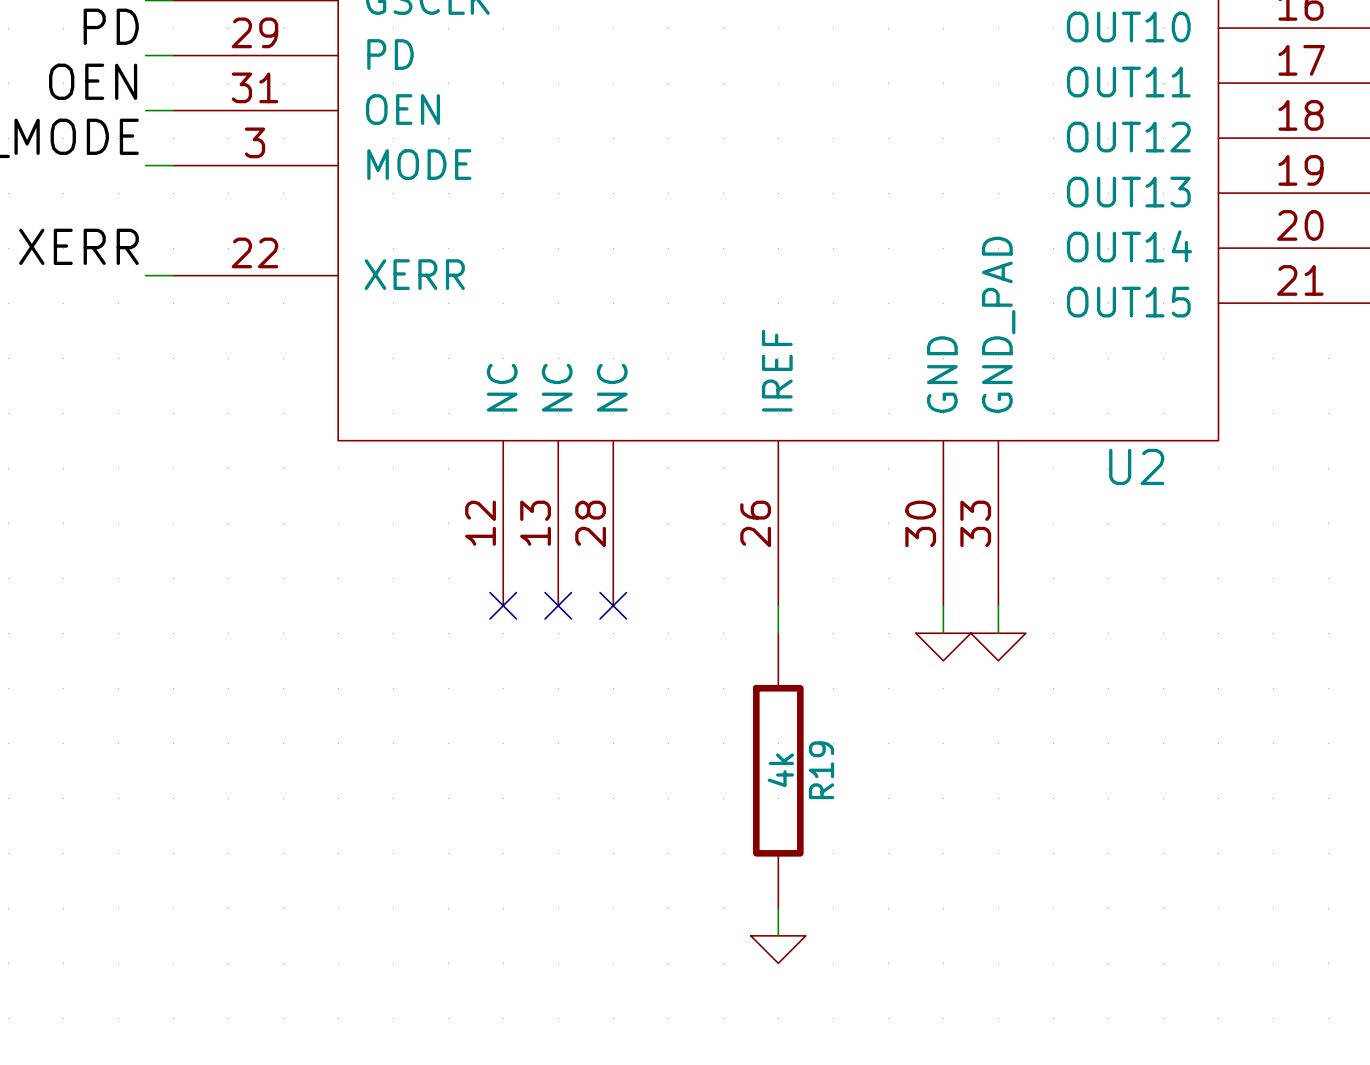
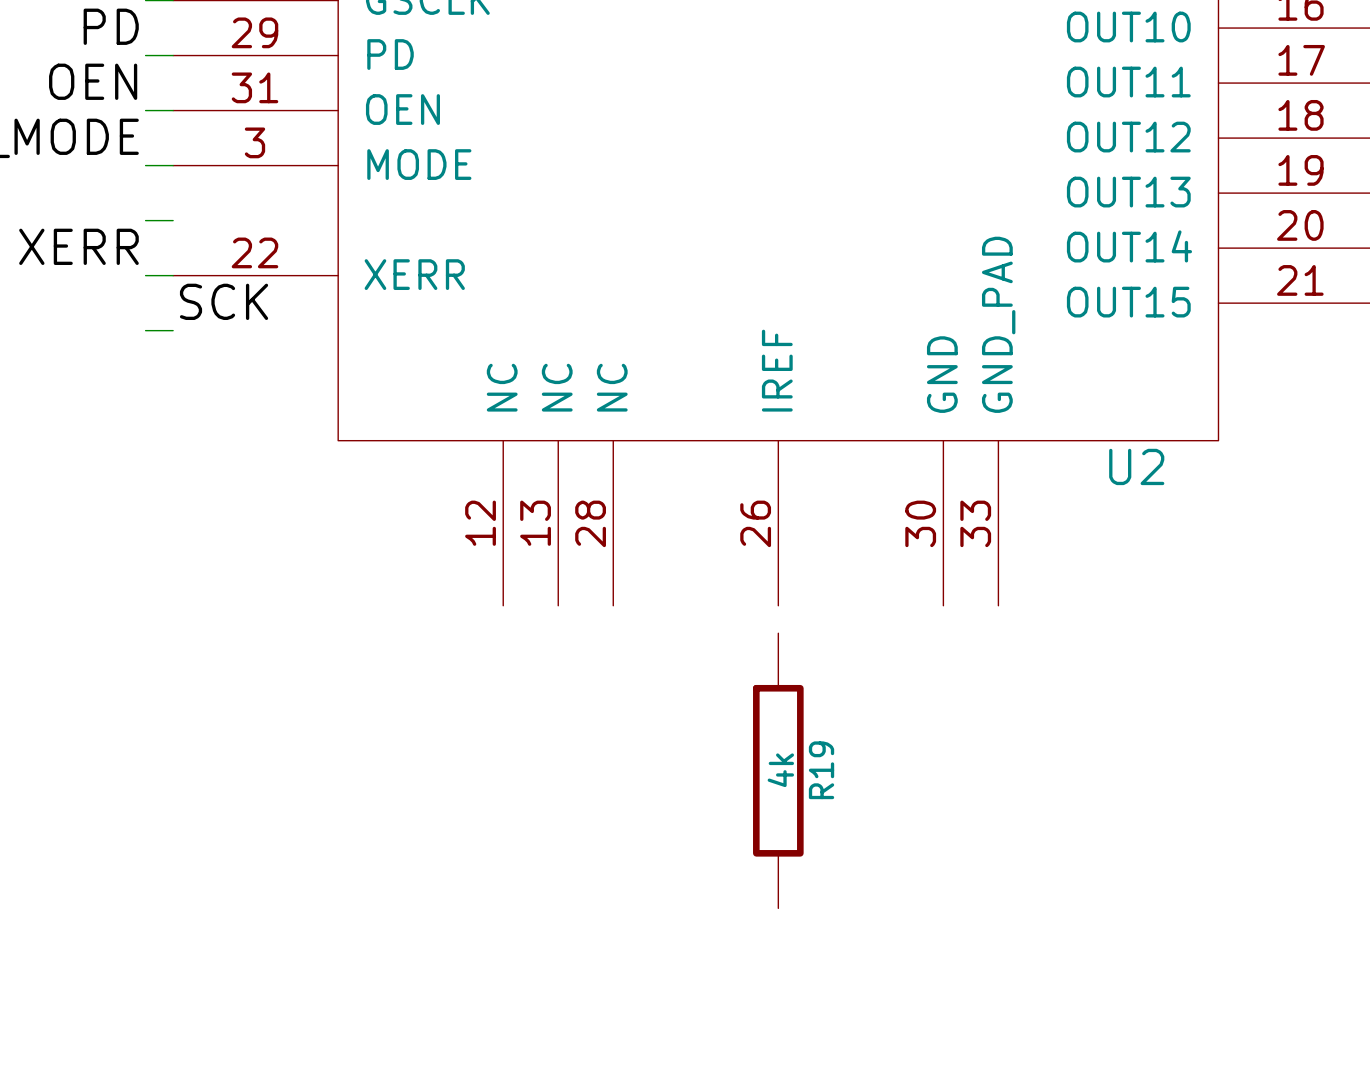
wire: none -> (145, 220) (173, 220)
label: none -> SCK (224, 301)
wire: none -> (145, 330) (173, 330)
no-connect mark: (503, 605) -> none
no-connect mark: (558, 605) -> none
no-connect mark: (613, 605) -> none
wire: (778, 605) (778, 633) -> none
wire: (943, 605) (943, 633) -> none
wire: (998, 605) (998, 633) -> none
power symbol: (943, 647) -> none
power symbol: (998, 647) -> none
wire: (778, 908) (778, 935) -> none
power symbol: (778, 949) -> none

